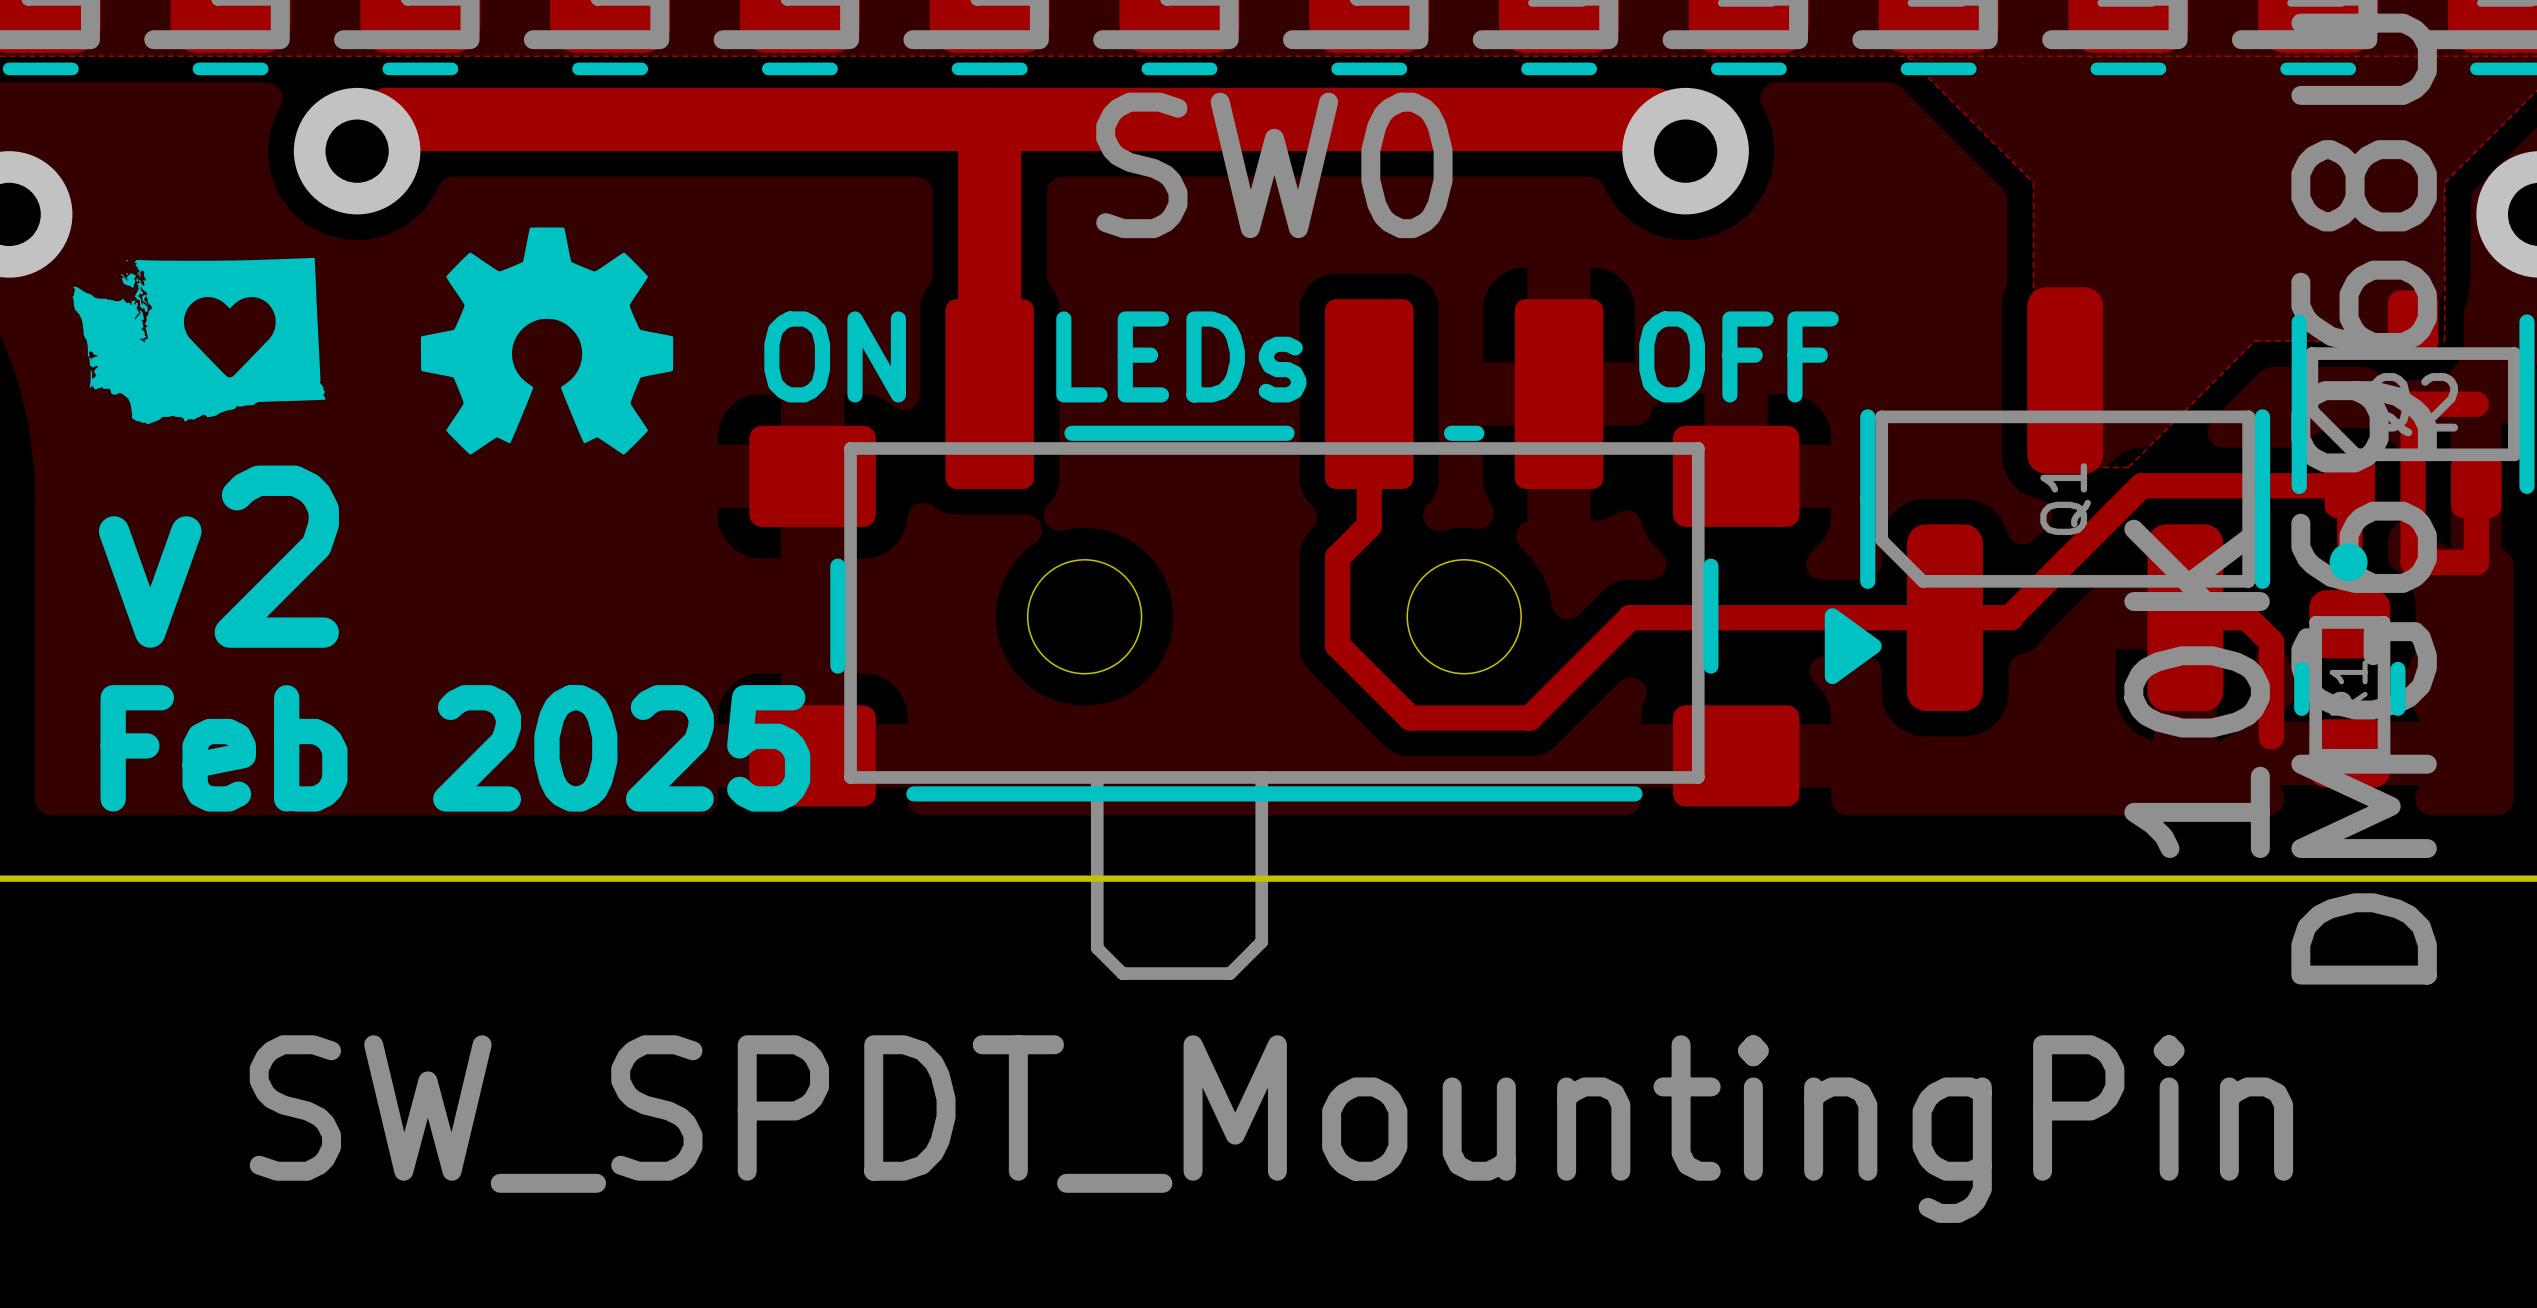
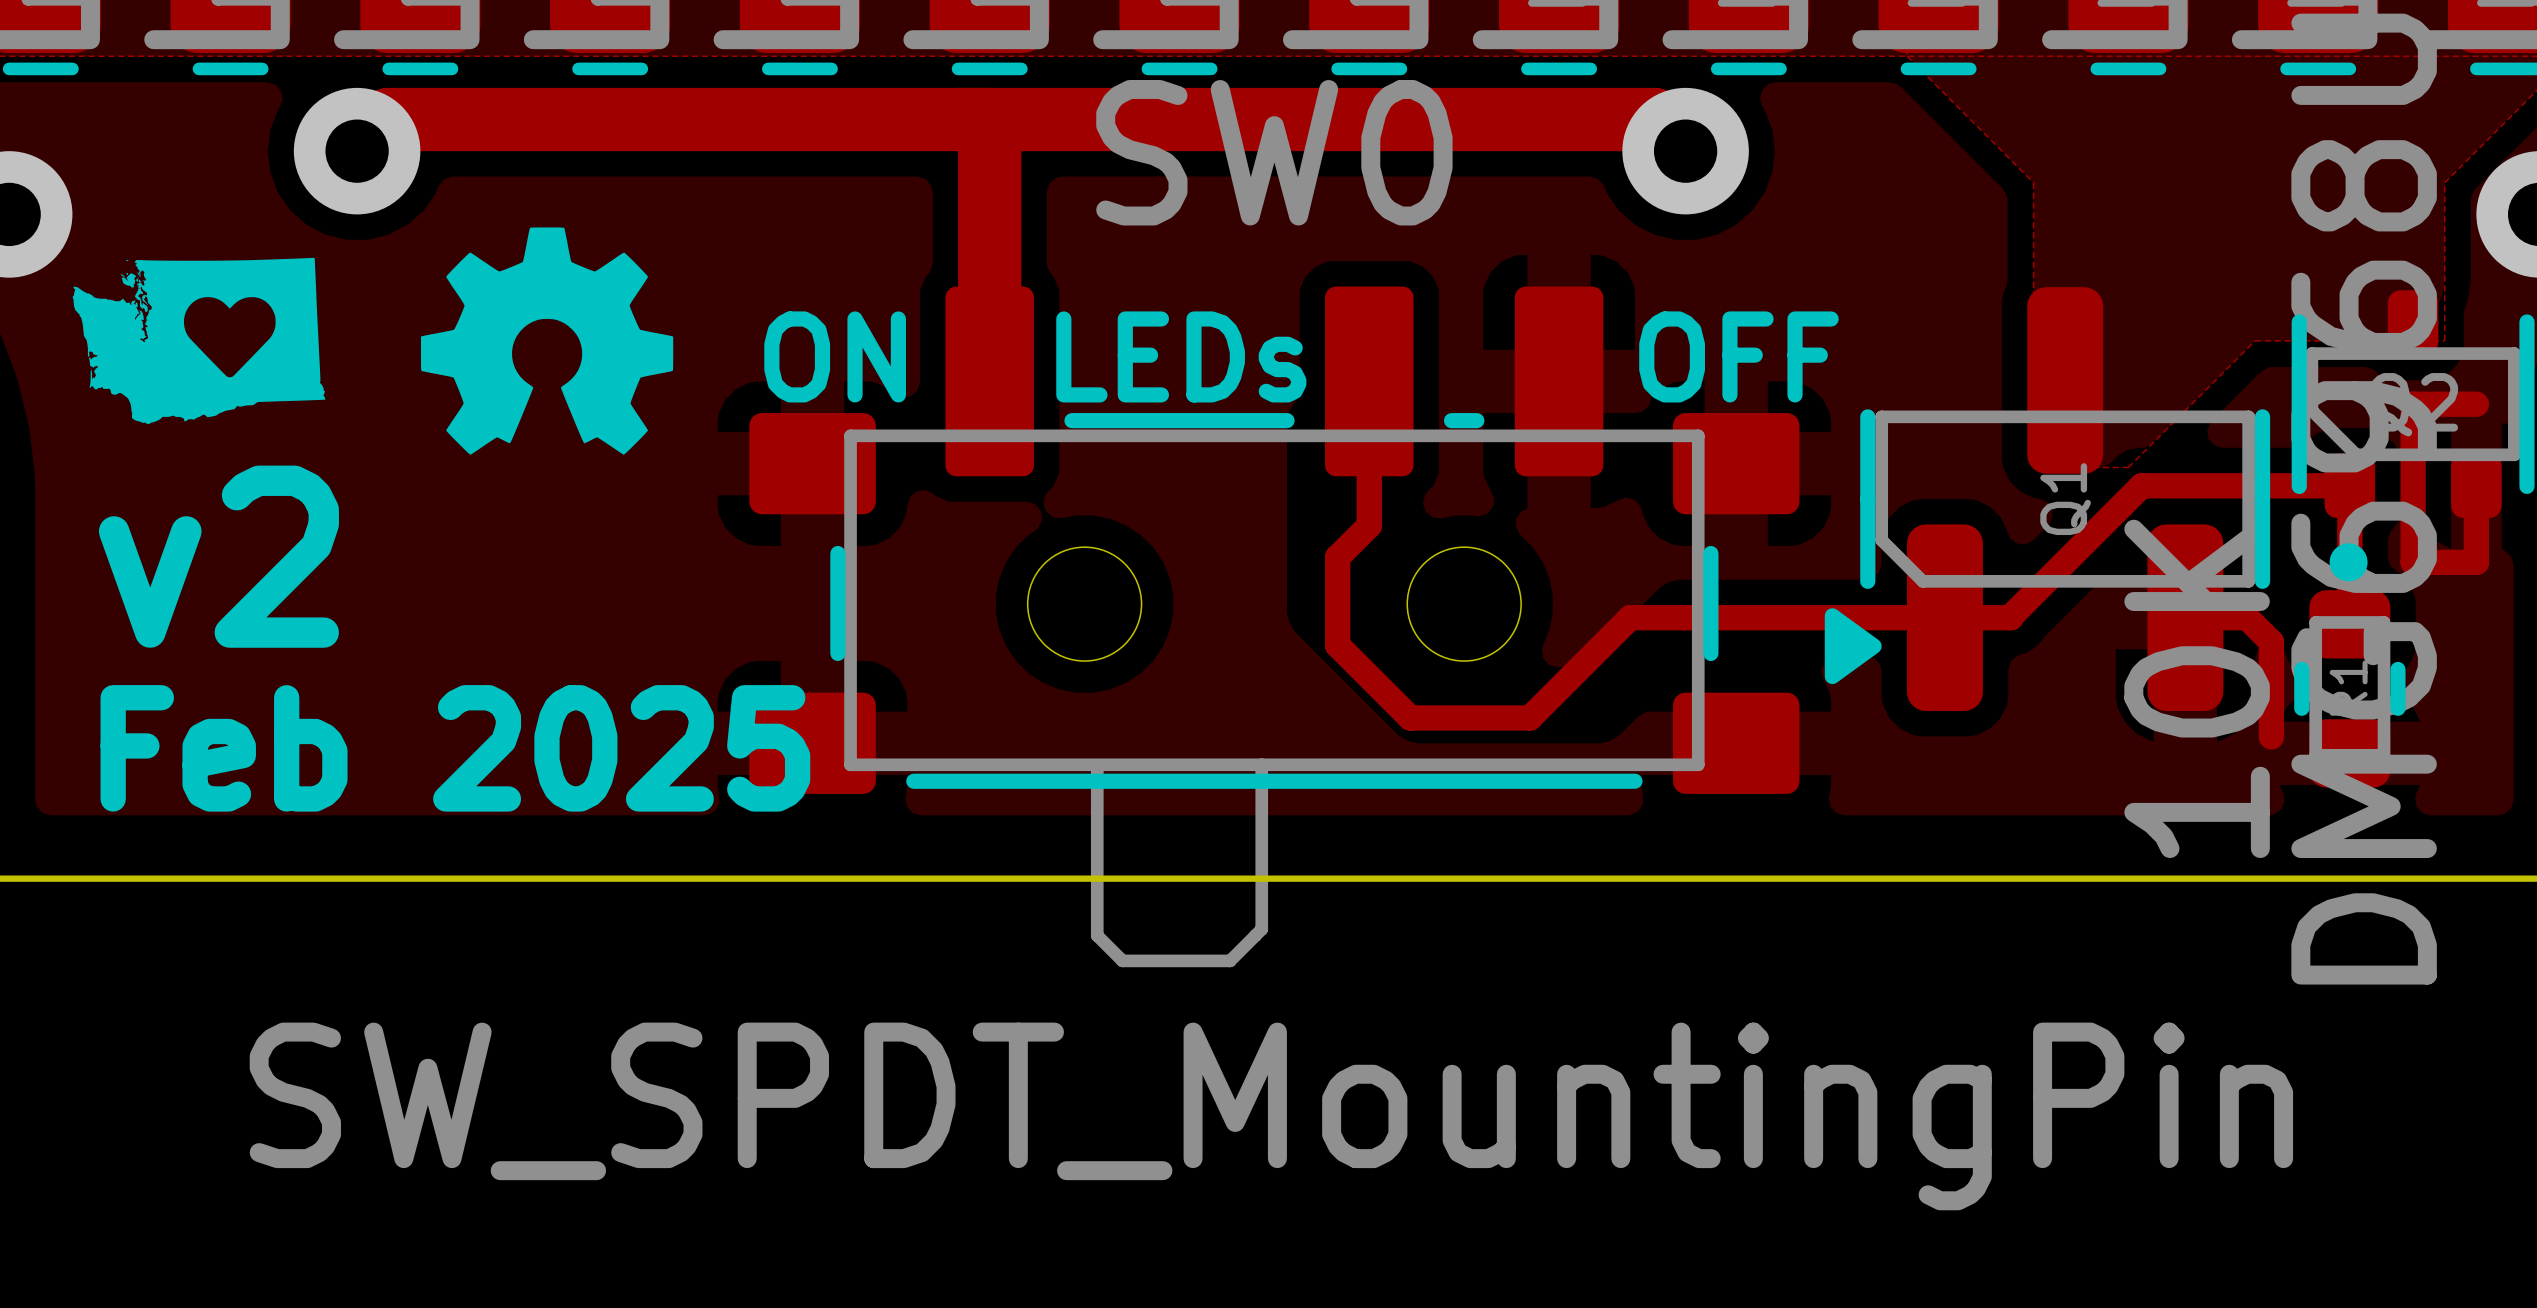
SW0 position: (1274, 639) -> (1274, 626)

